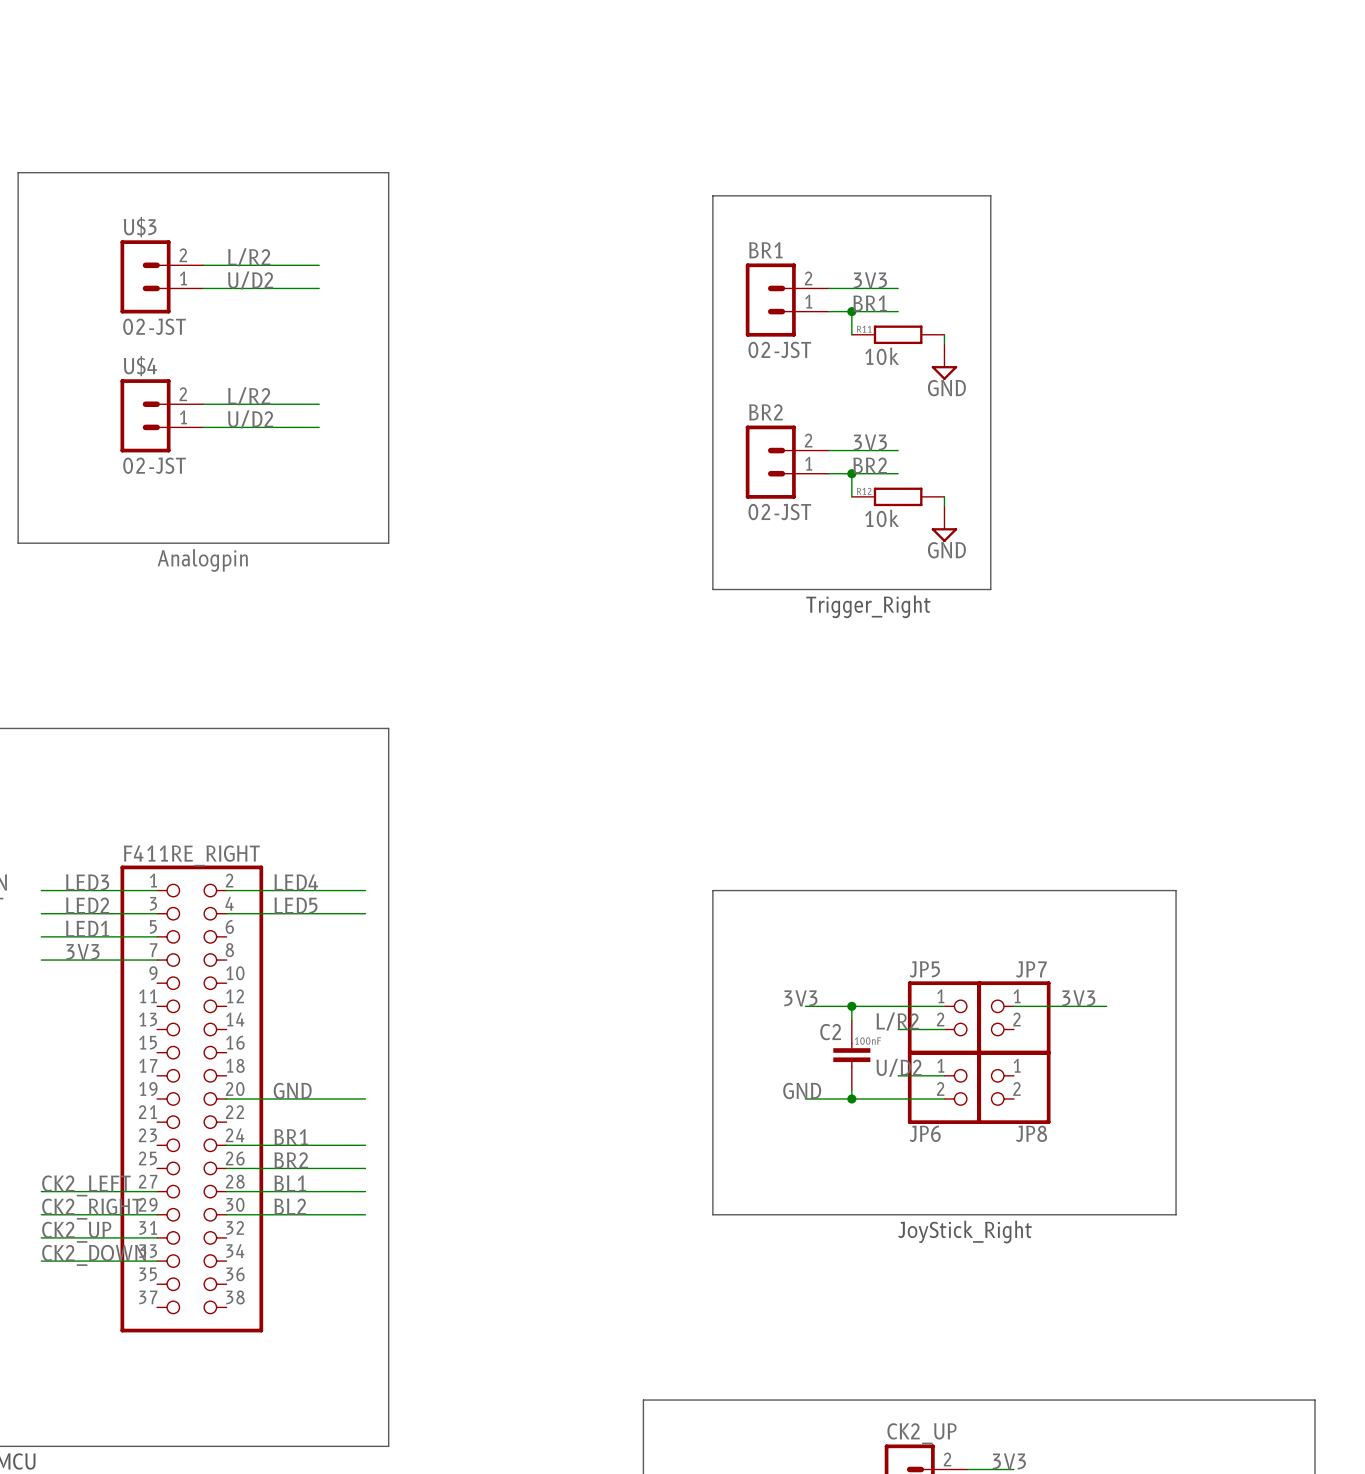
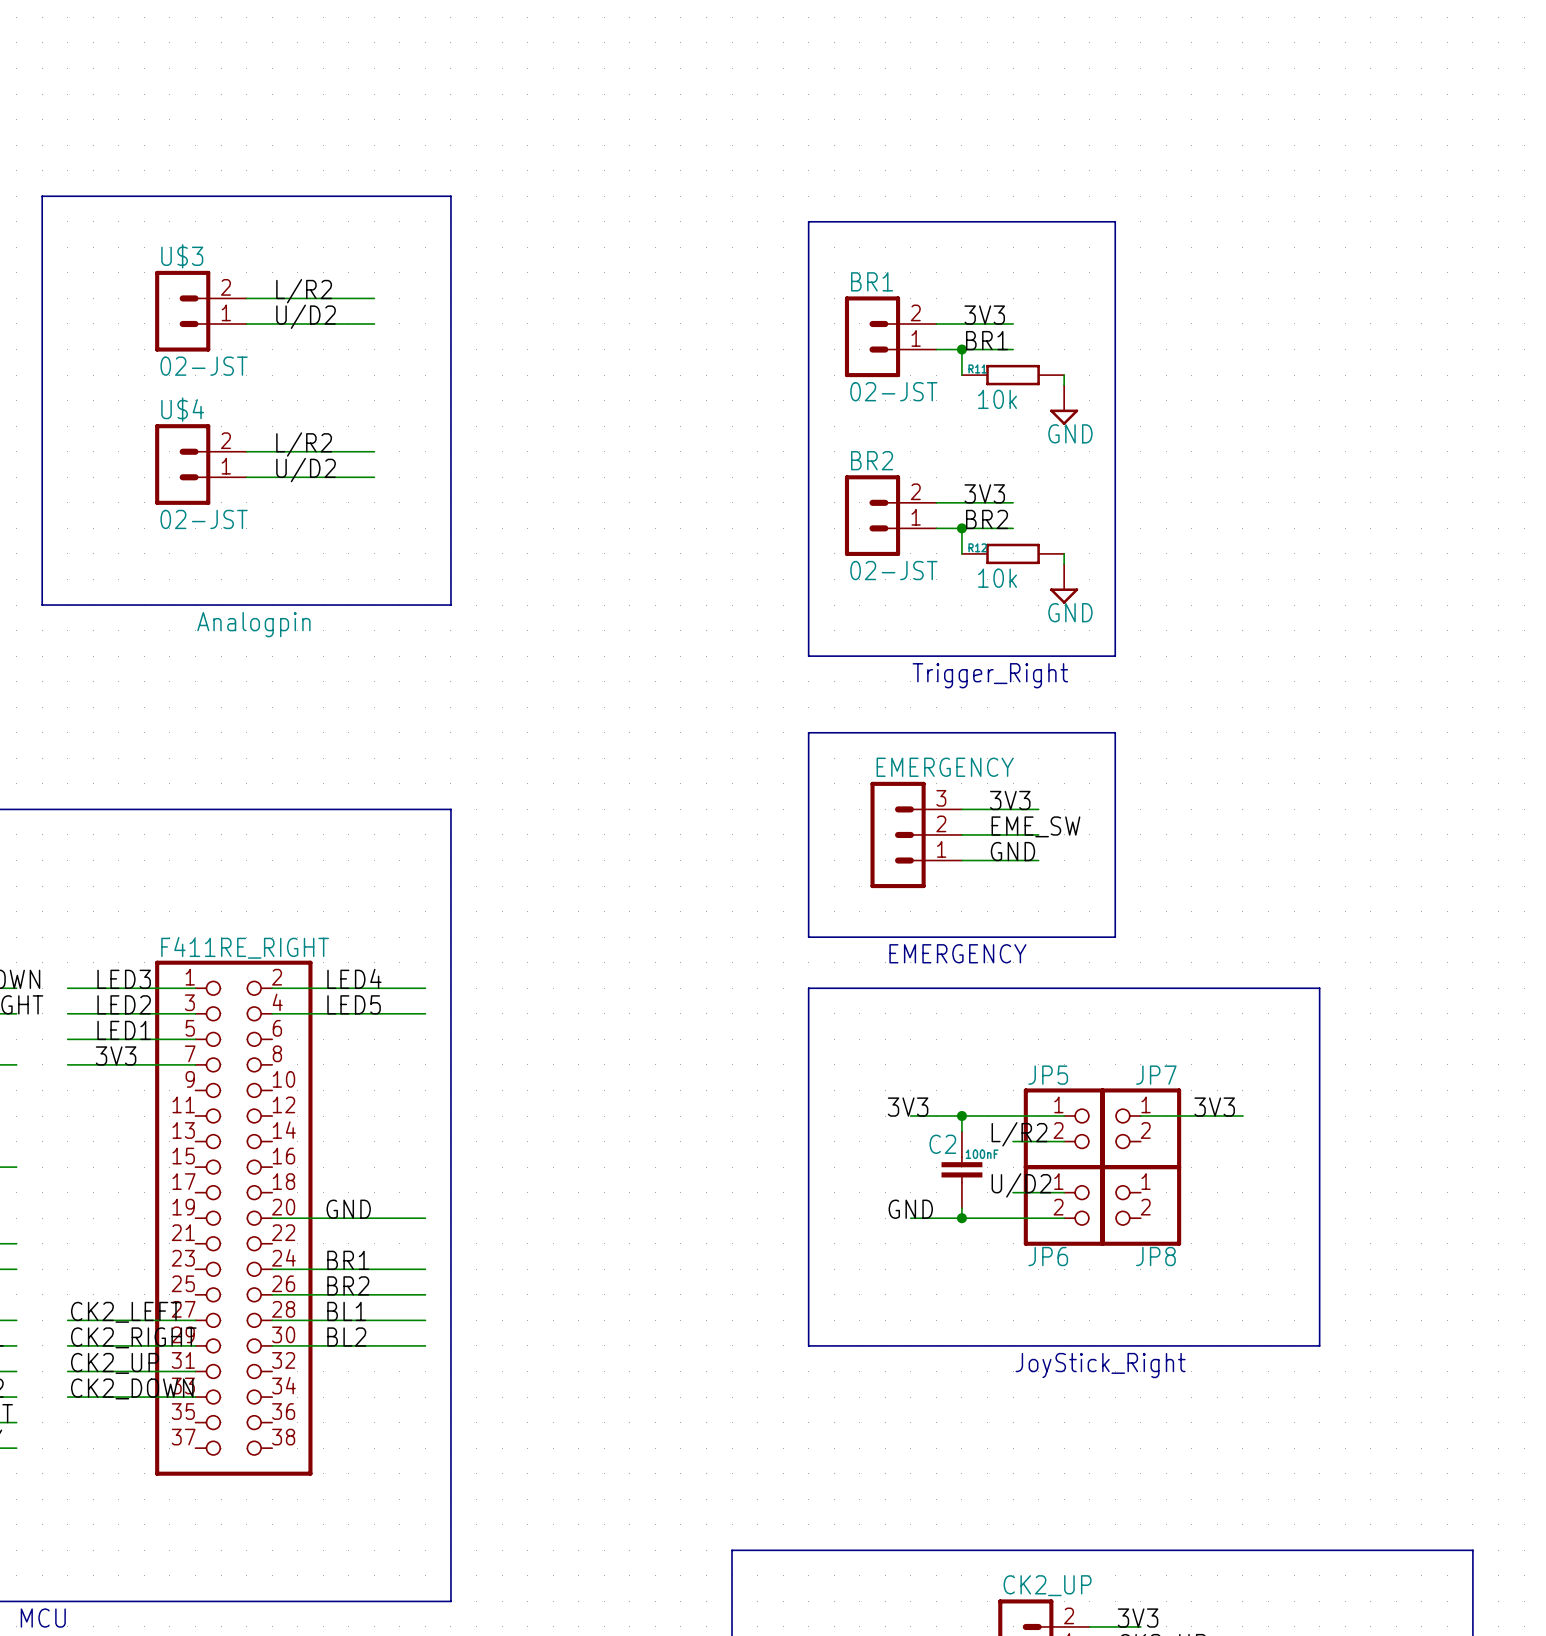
line: none -> (808, 732) (808, 937) (1115, 937) (1115, 732) (808, 732)
label: none -> 3V3 (1010, 800)
wire: none -> (961, 809) (1038, 809)
label: none -> EME_SW (1035, 826)
EMERGENCY: none -> (916, 834)
wire: none -> (961, 834) (1038, 834)
label: none -> GND (1012, 851)
wire: none -> (961, 860) (1038, 860)
text: none -> EMERGENCY (957, 953)

